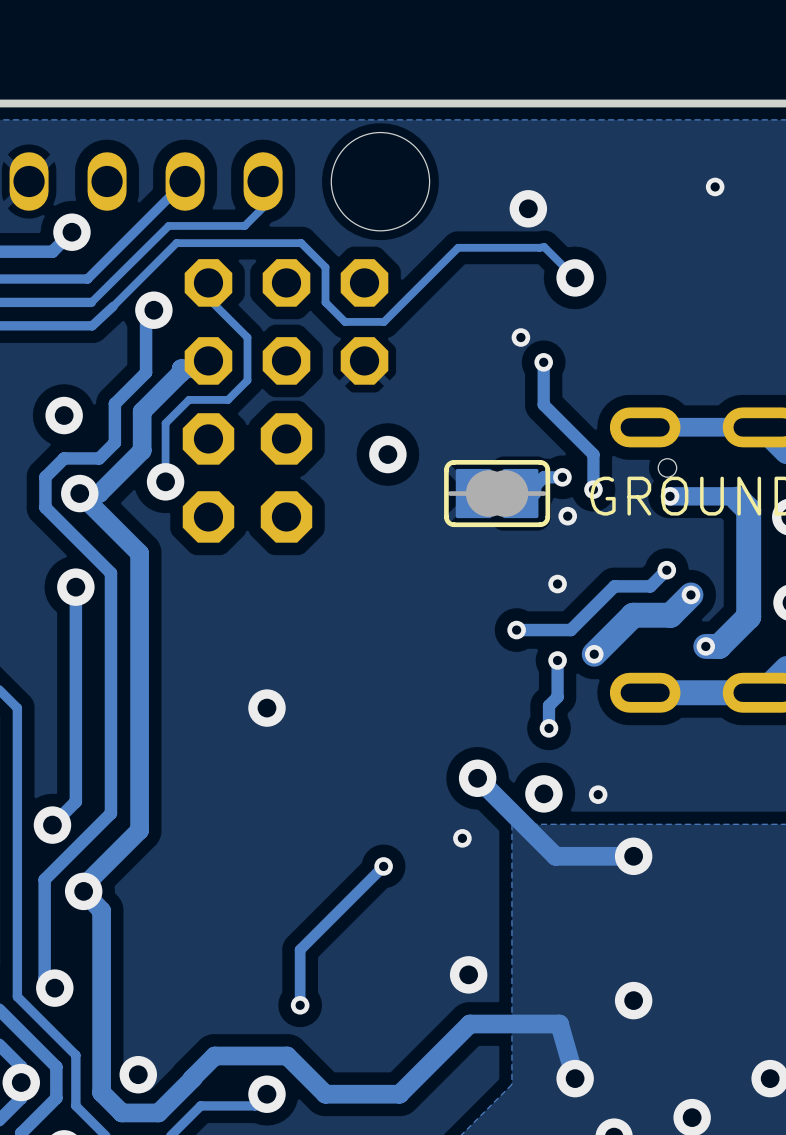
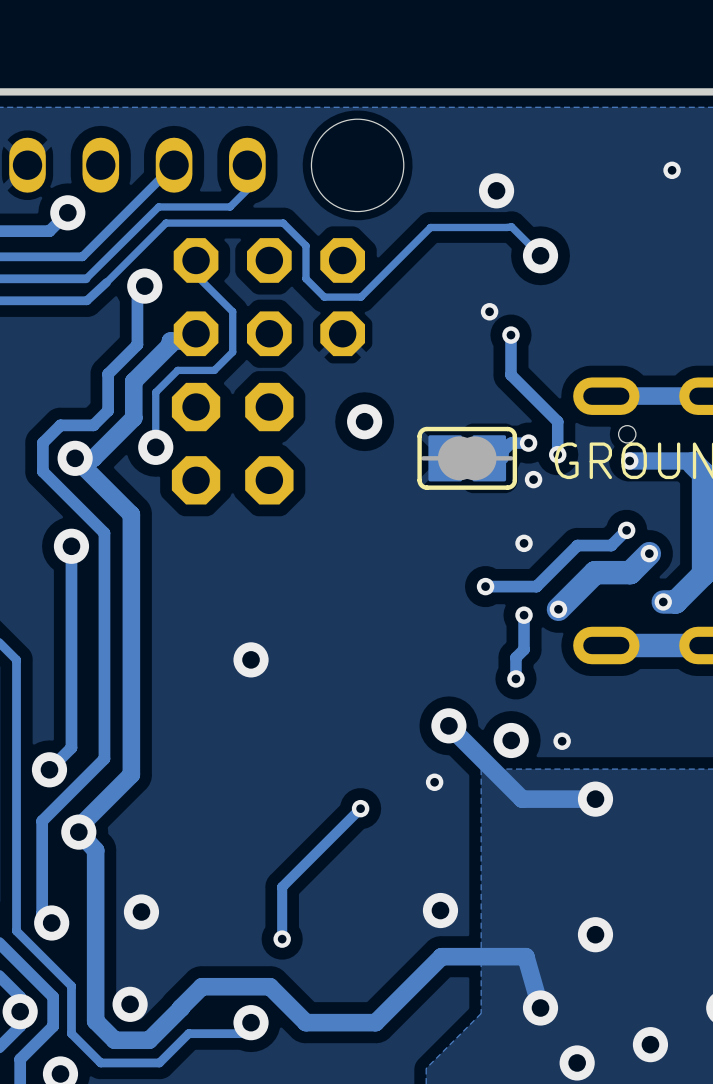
via: (64, 415) -> none
via: none -> (141, 911)

